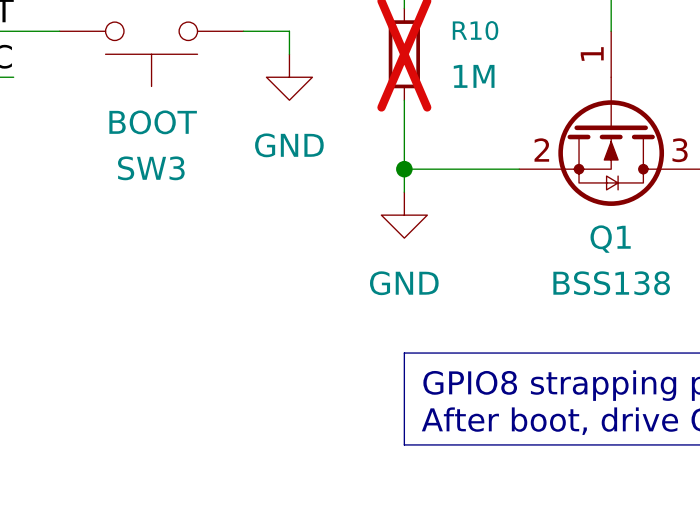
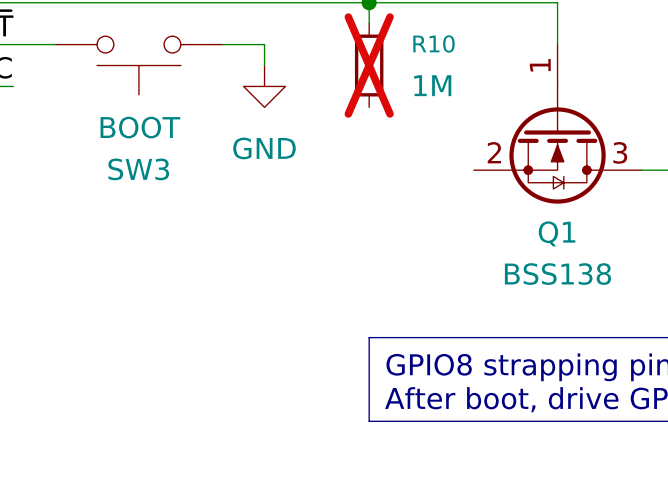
wire: (404, 100) (404, 192) -> none
wire: (404, 169) (519, 169) -> none
junction: (404, 169) -> none
power symbol: GND (404, 215) -> none

